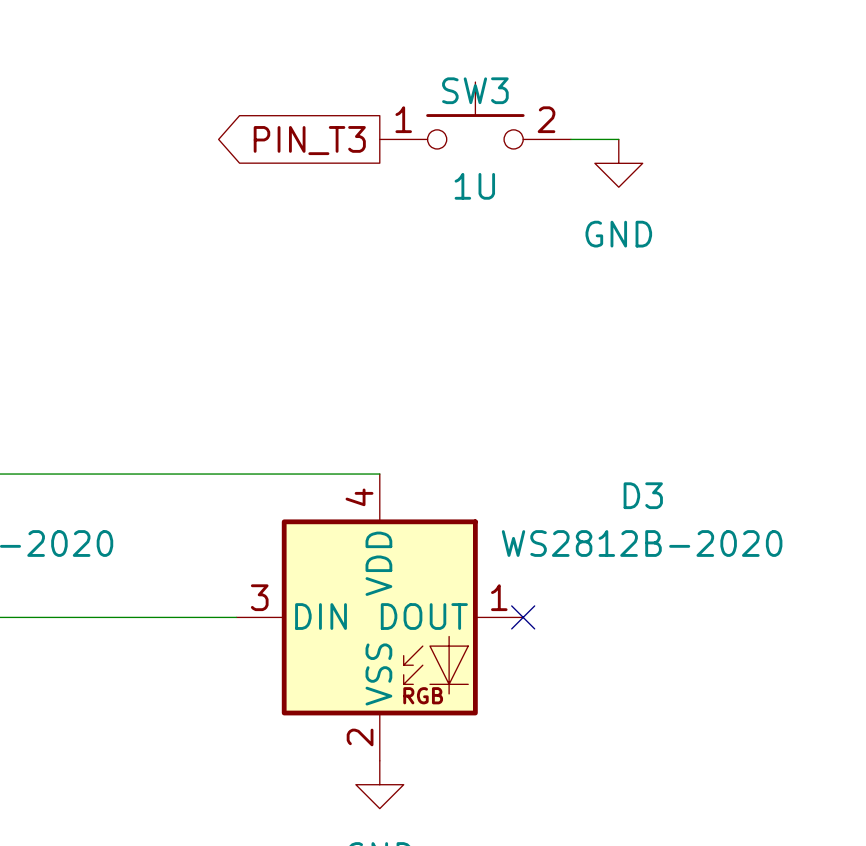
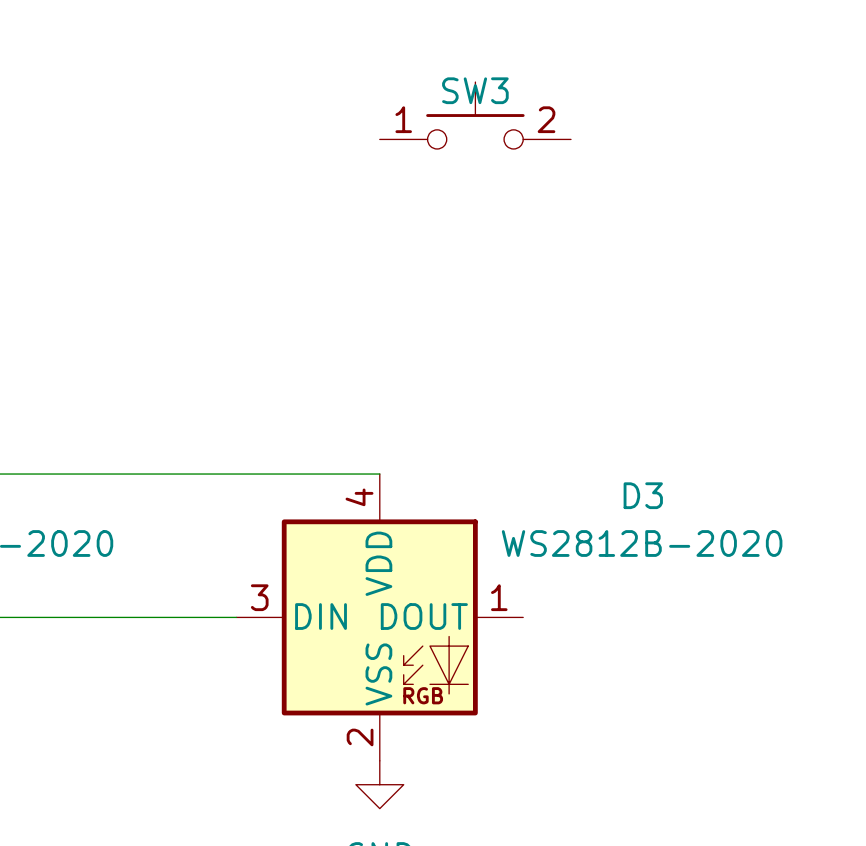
wire: (570, 139) (618, 139) -> none
global label: PIN_T3 (309, 140) -> none
power symbol: GND (618, 163) -> none
SW3 value: 1U (474, 186) -> none
no-connect mark: (523, 617) -> none

